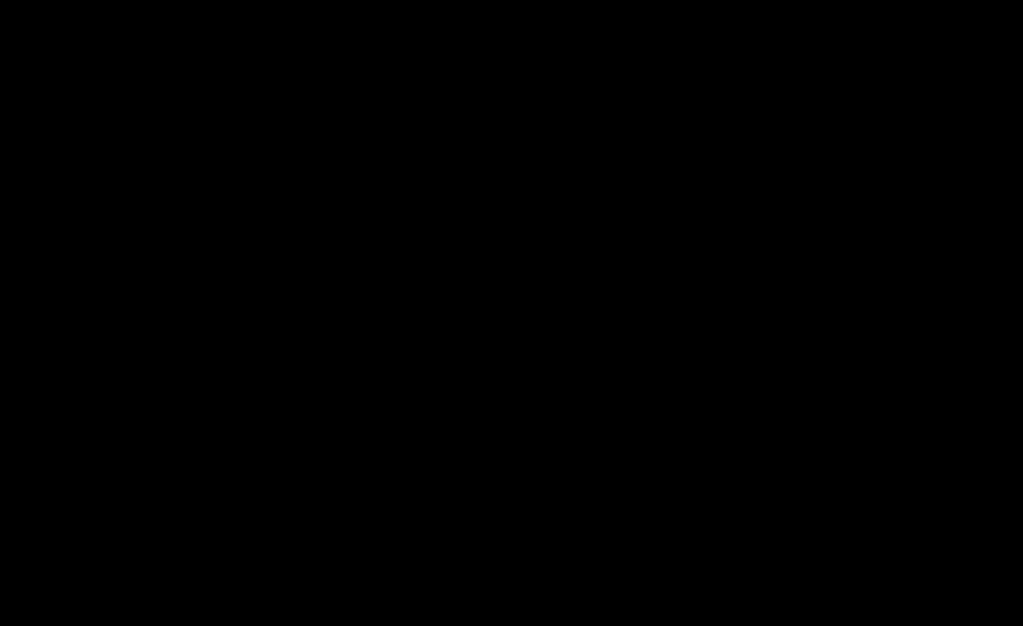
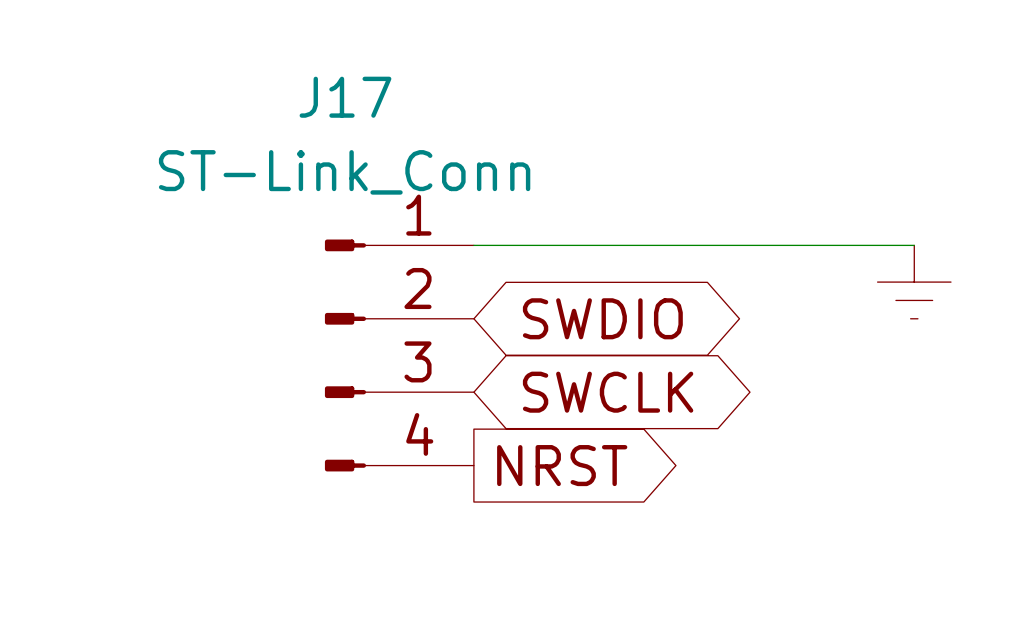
wire: none -> (473, 245) (914, 245)
power symbol: none -> (914, 282)
global label: none -> SWDIO (602, 318)
J17: none -> ST-Link_Conn (399, 355)
global label: none -> SWCLK (608, 392)
global label: none -> NRST (562, 465)

